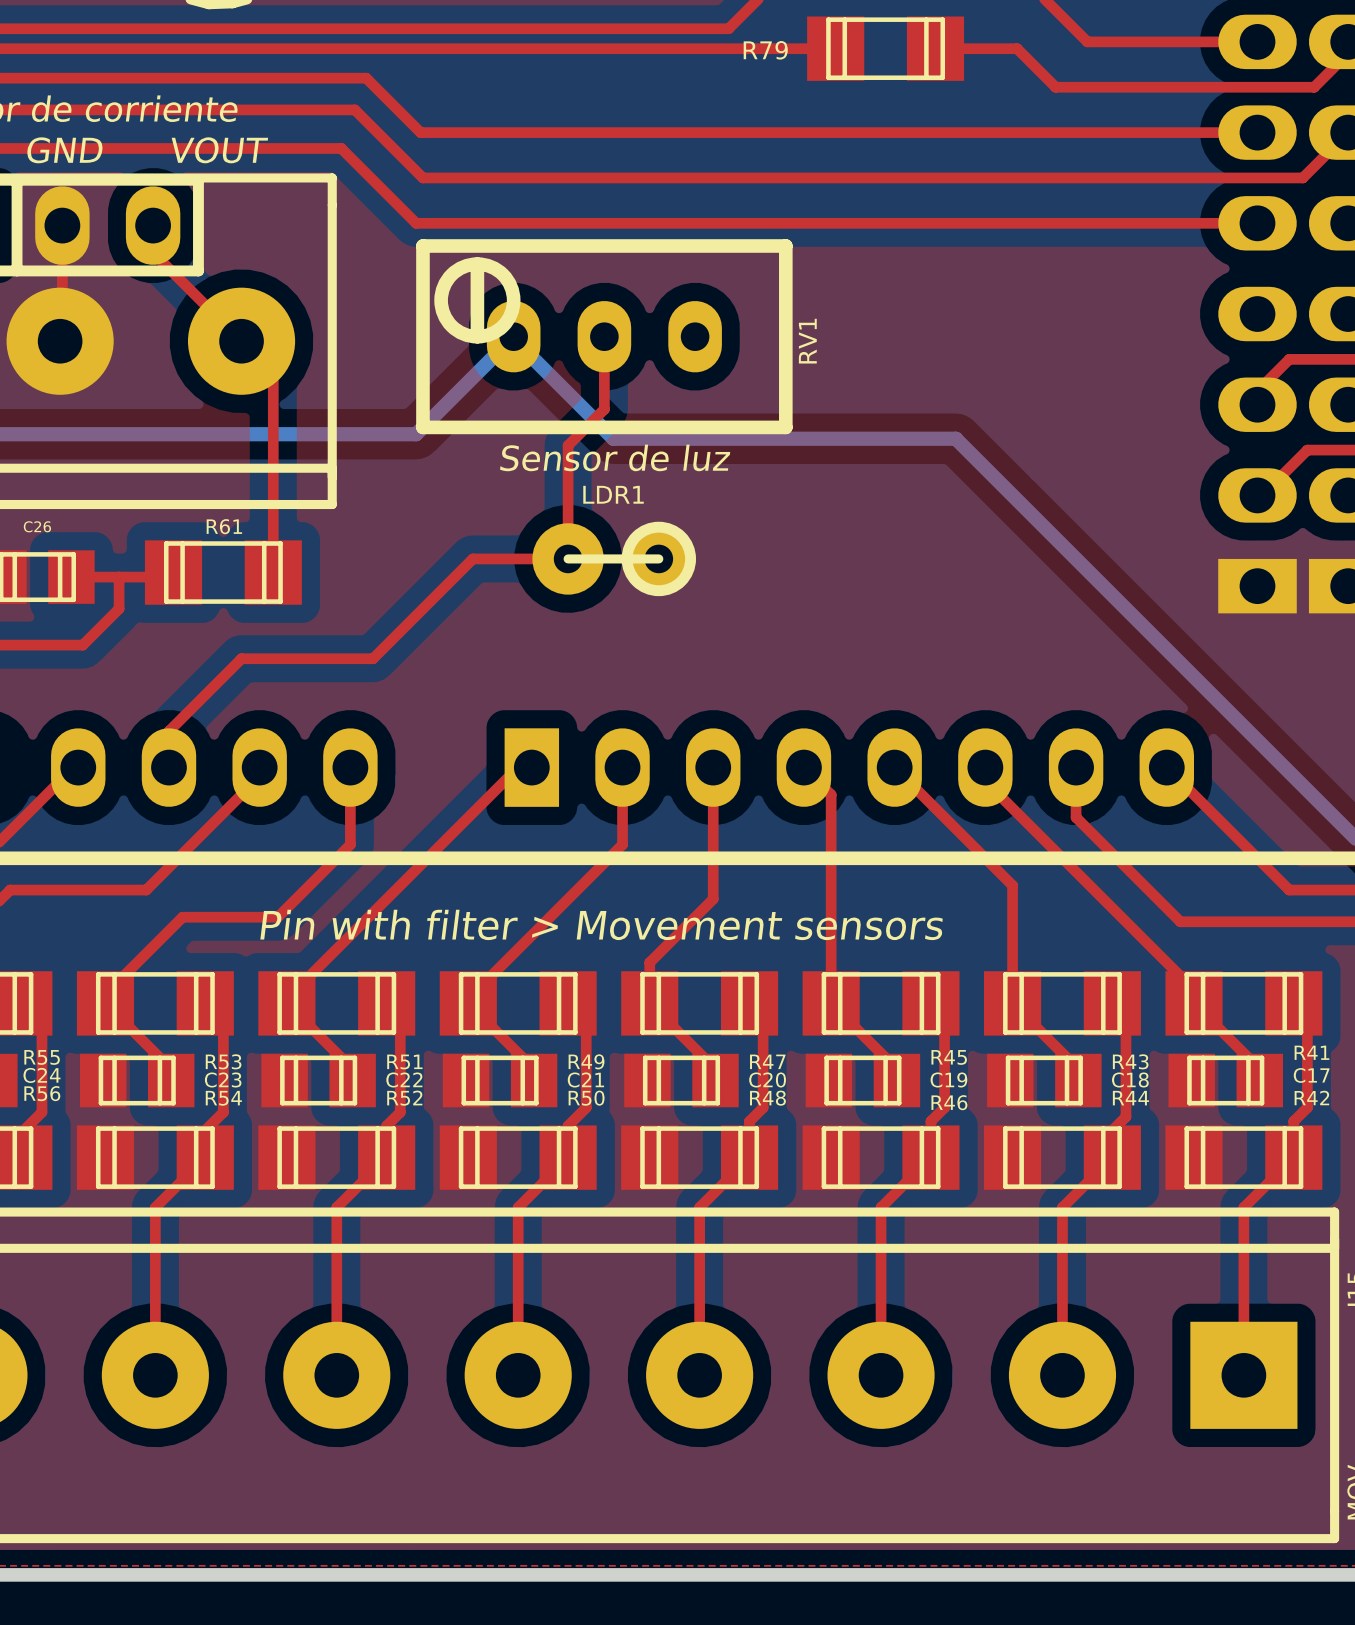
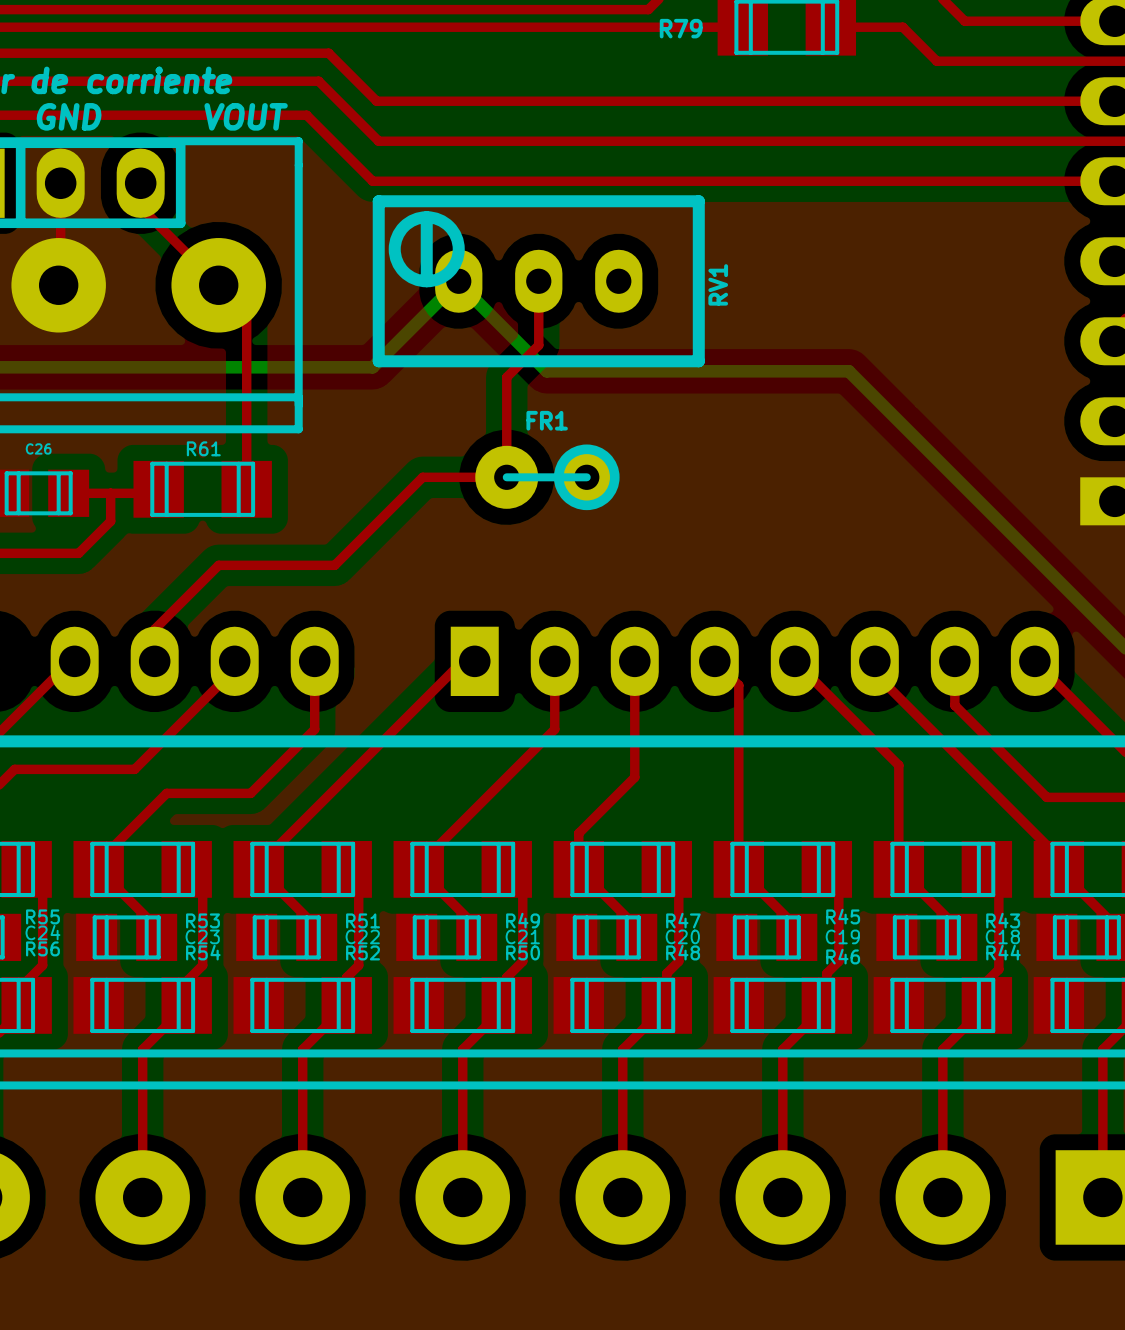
text: Sensor de luz (615, 457) -> none
LDR1 name: LDR1 (613, 494) -> FR1 (547, 420)
text: Pin with filter > Movement sensors (601, 924) -> none

